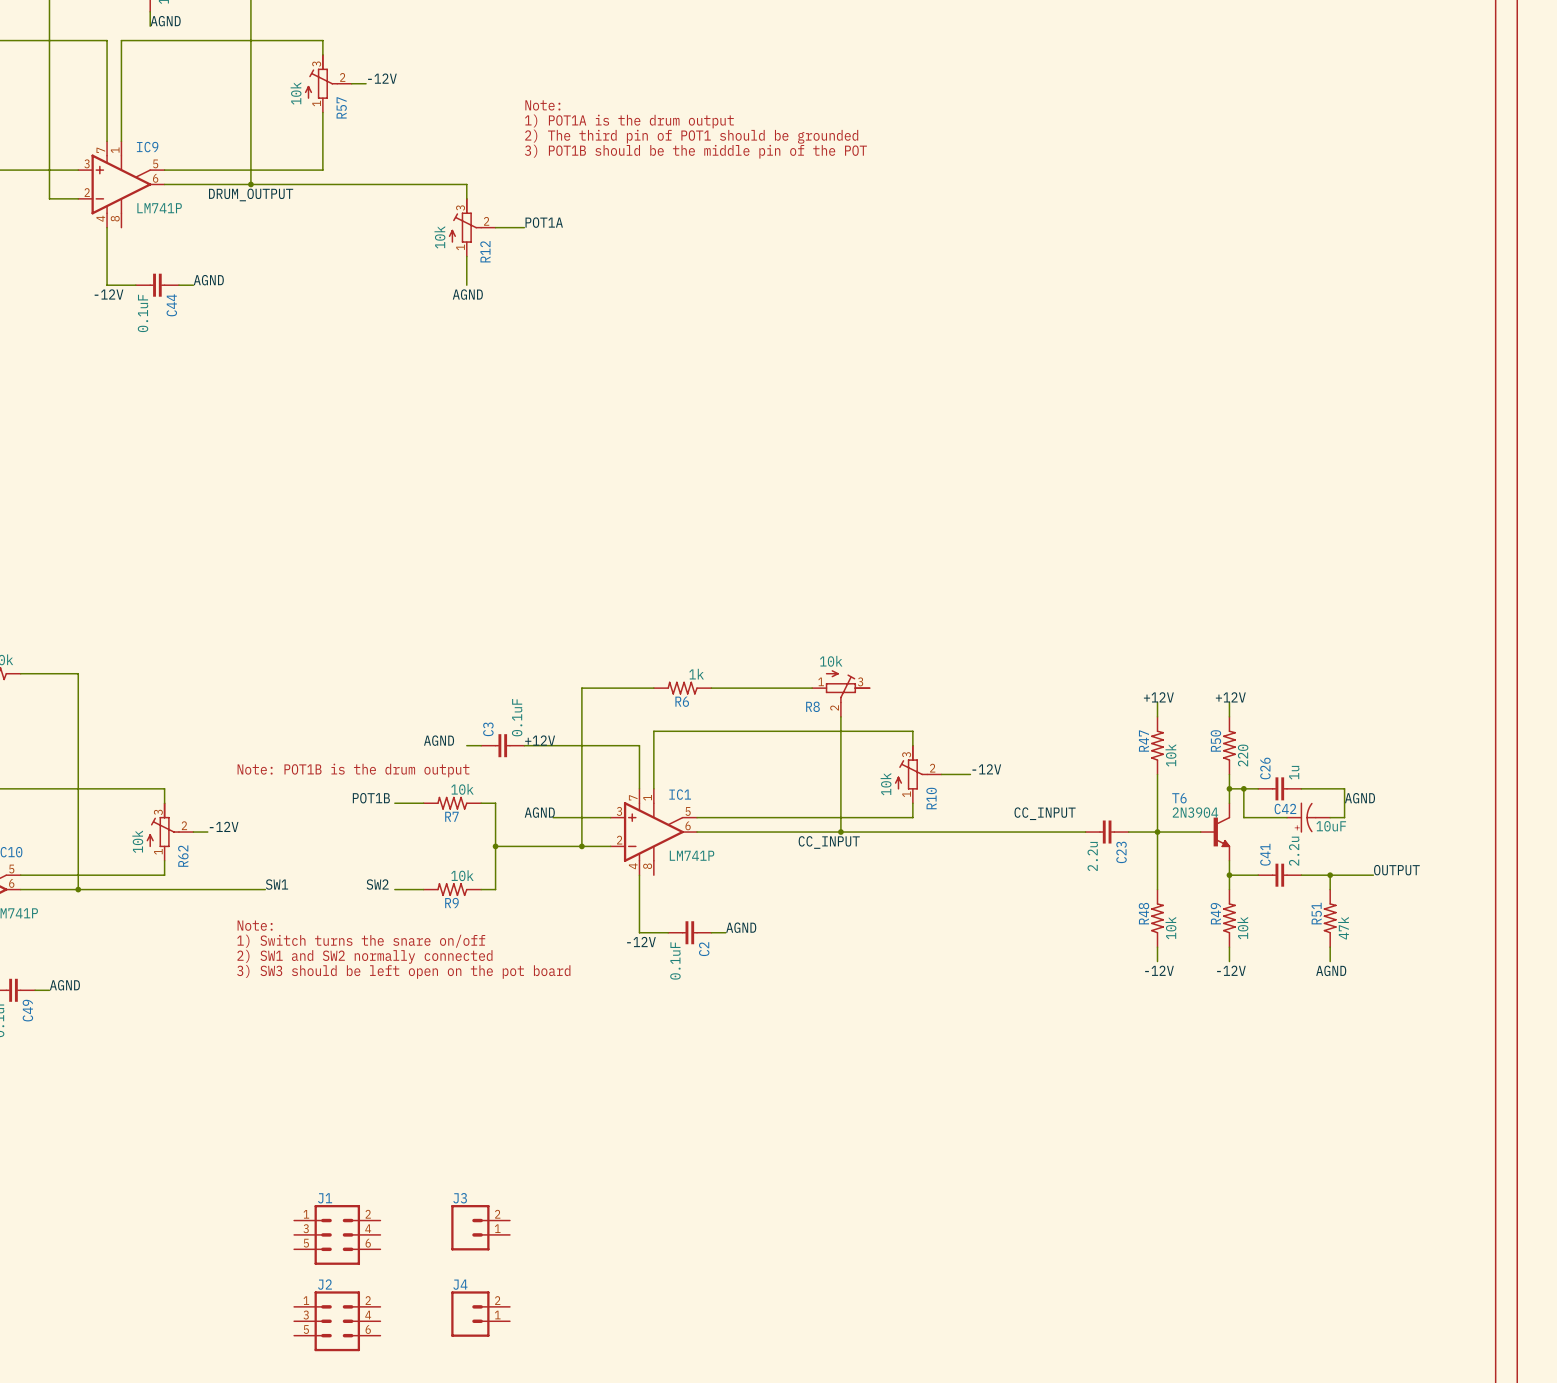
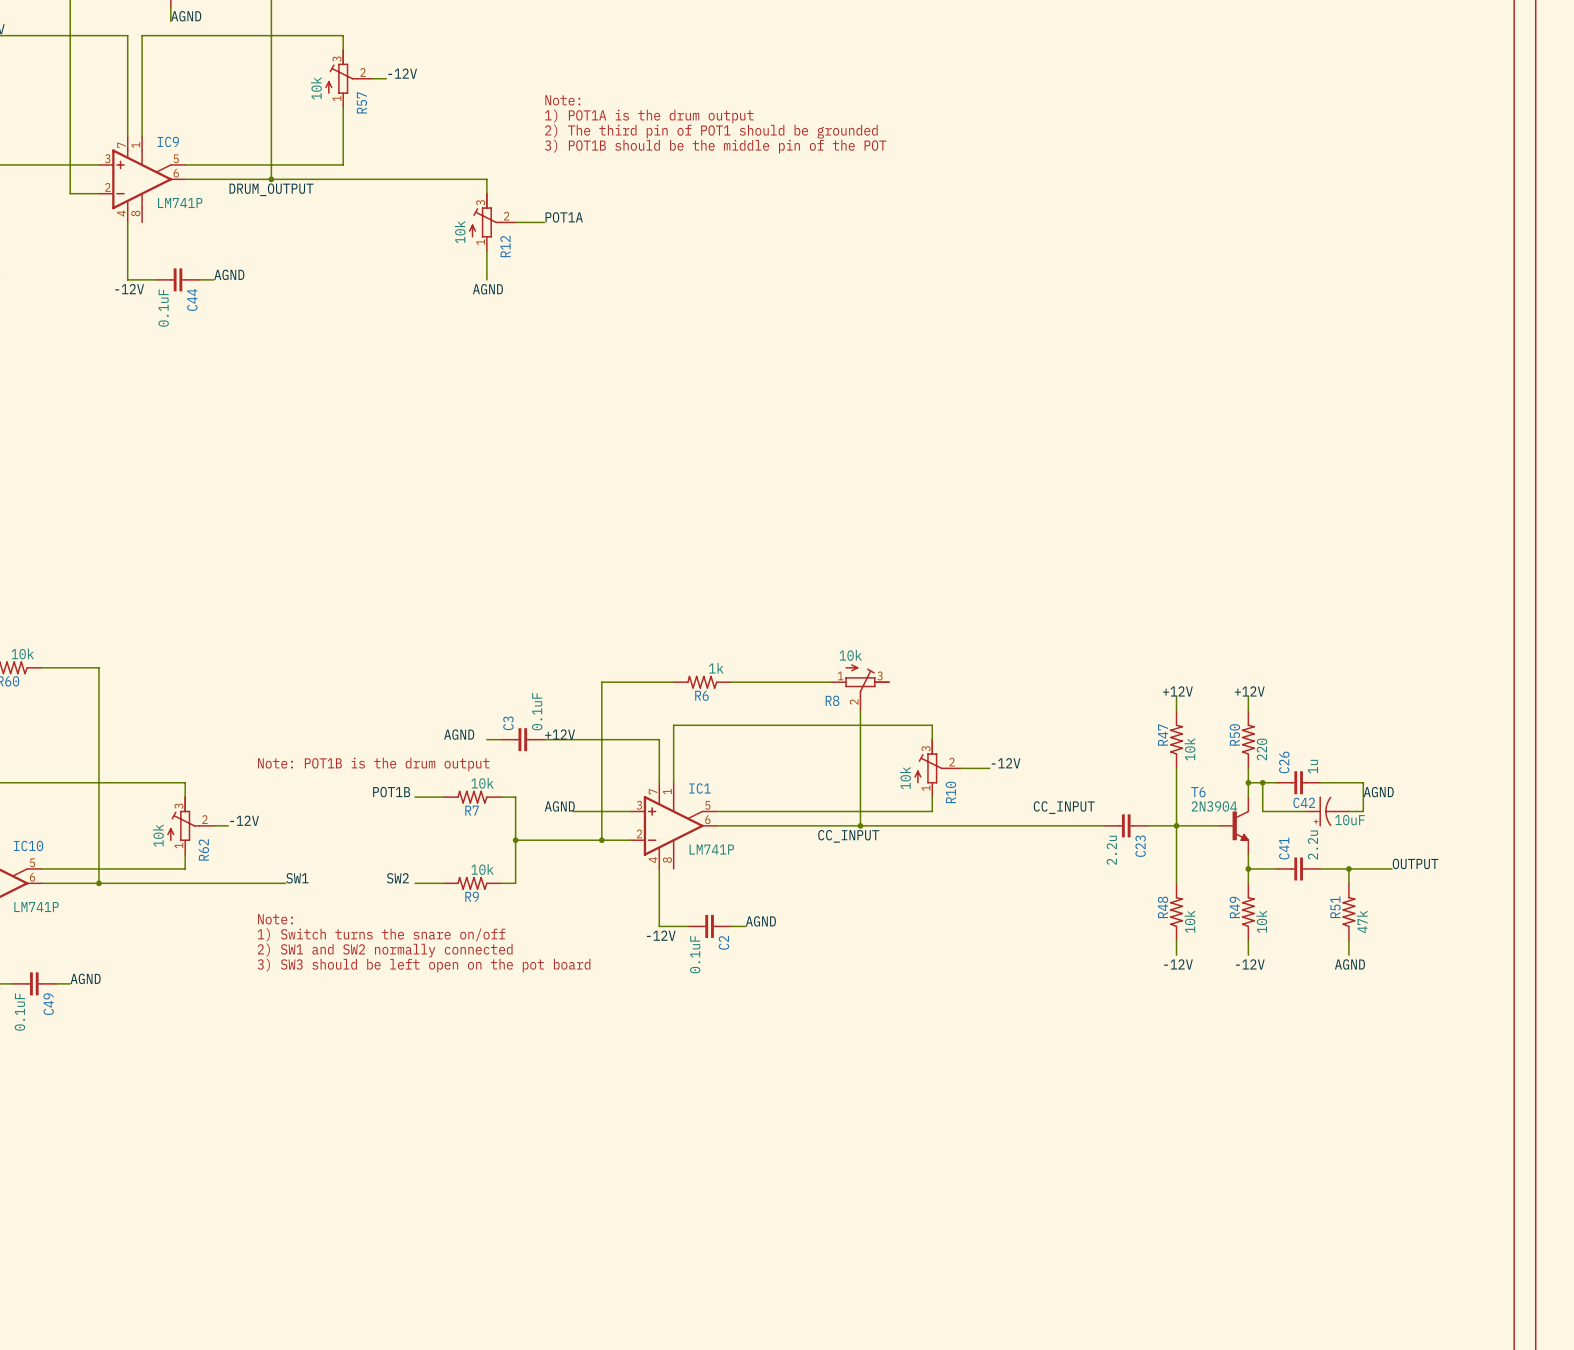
J3: (480, 1227) -> none
J1: (337, 1234) -> none
J4: (480, 1314) -> none
J2: (337, 1321) -> none

